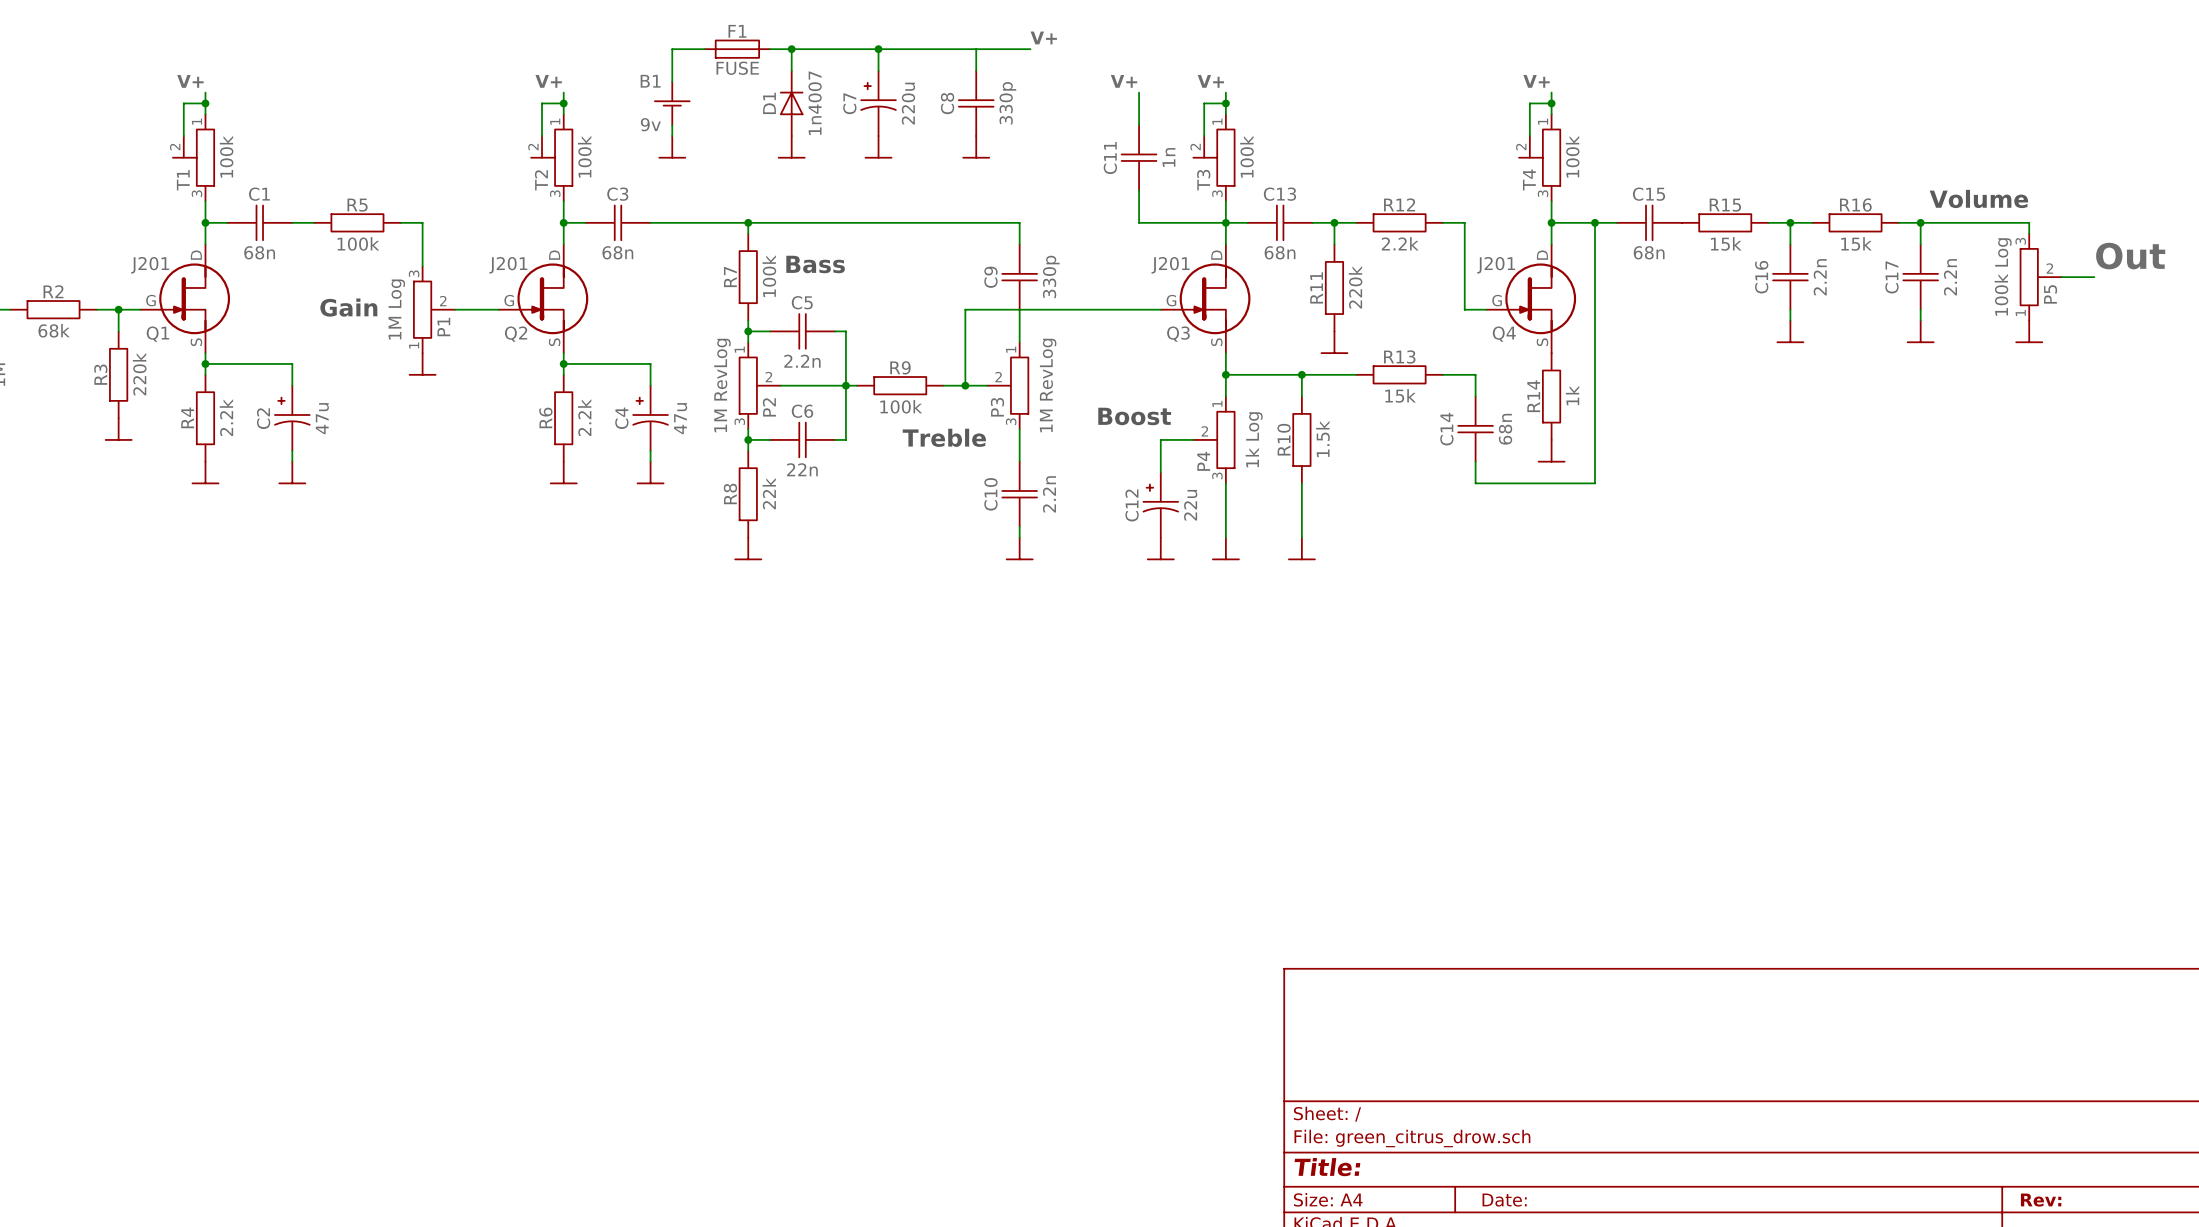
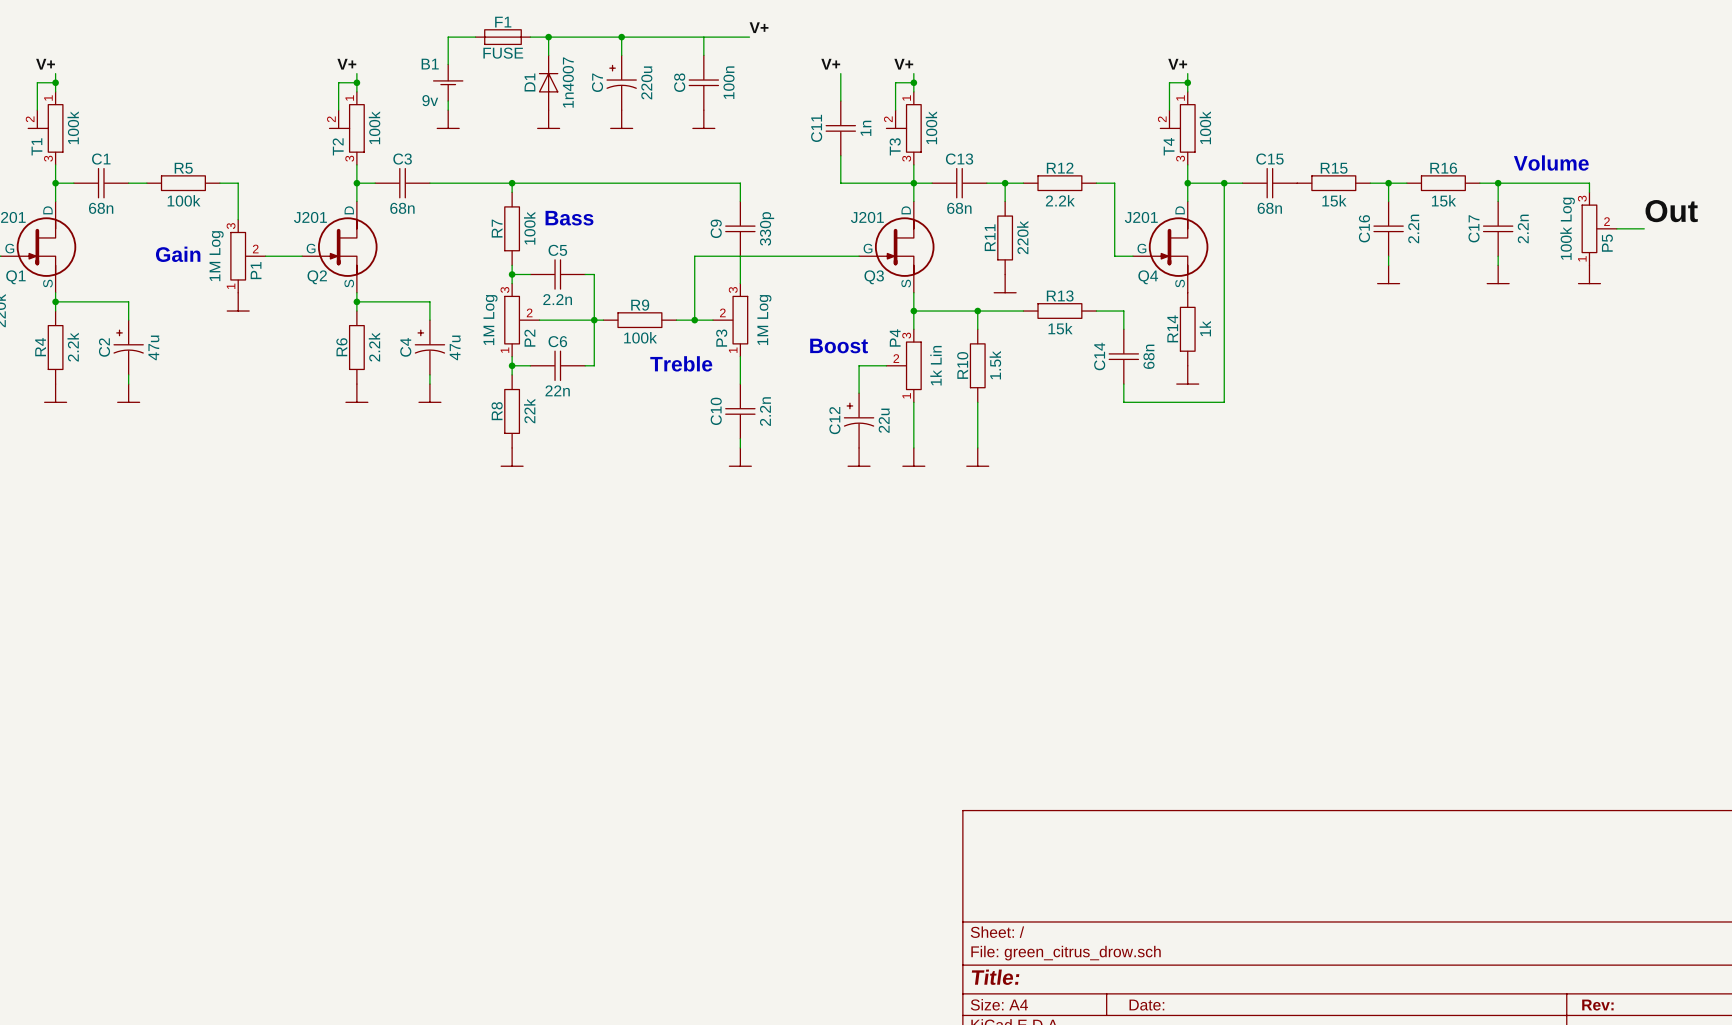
C8 value: 330p (1007, 103) -> 100n (729, 82)
P2 value: 1M RevLog (722, 385) -> 1M Log (490, 320)
P2 flip: as is (748, 385) -> up-down (512, 320)
P3 flip: as is (1019, 385) -> up-down (740, 320)
P3 value: 1M RevLog (1048, 385) -> 1M Log (764, 320)
P4 flip: as is (1225, 439) -> up-down (913, 365)
P4 value: 1k Log (1254, 439) -> 1k Lin (935, 365)

